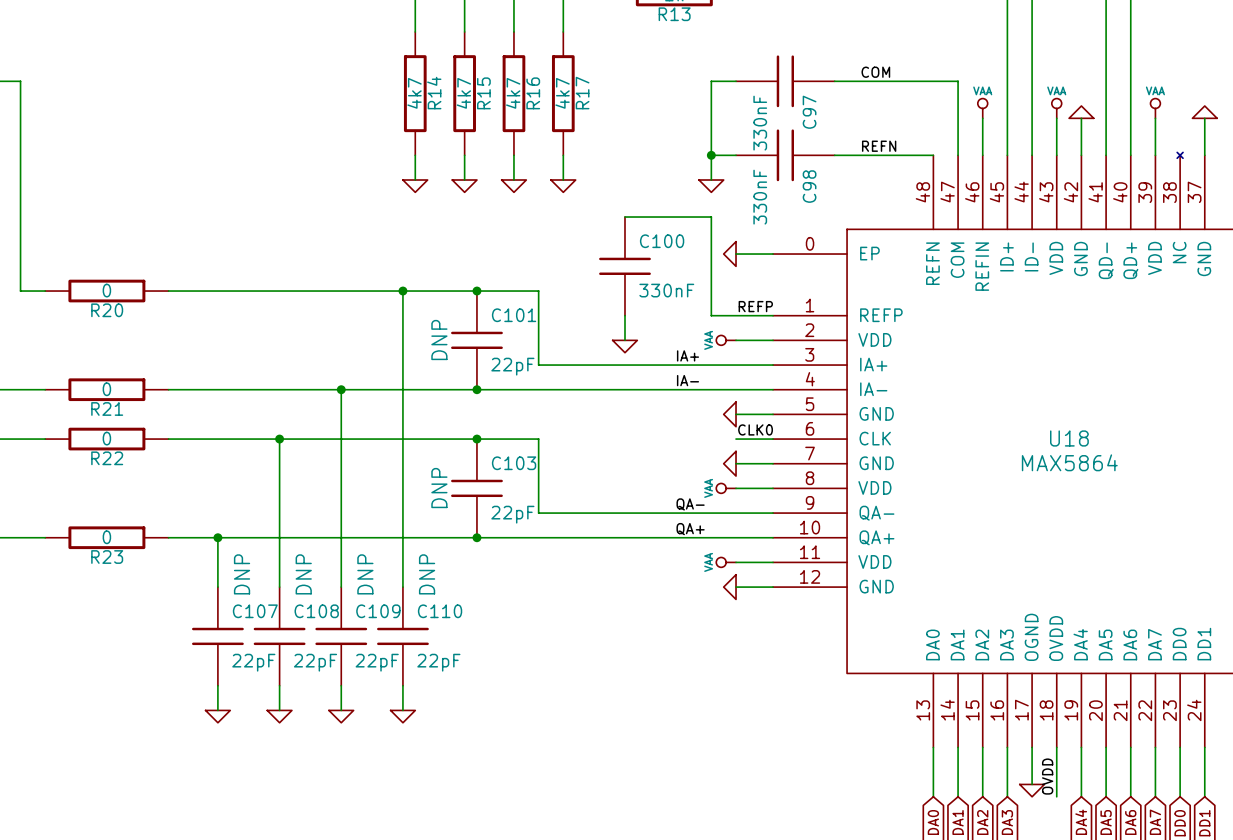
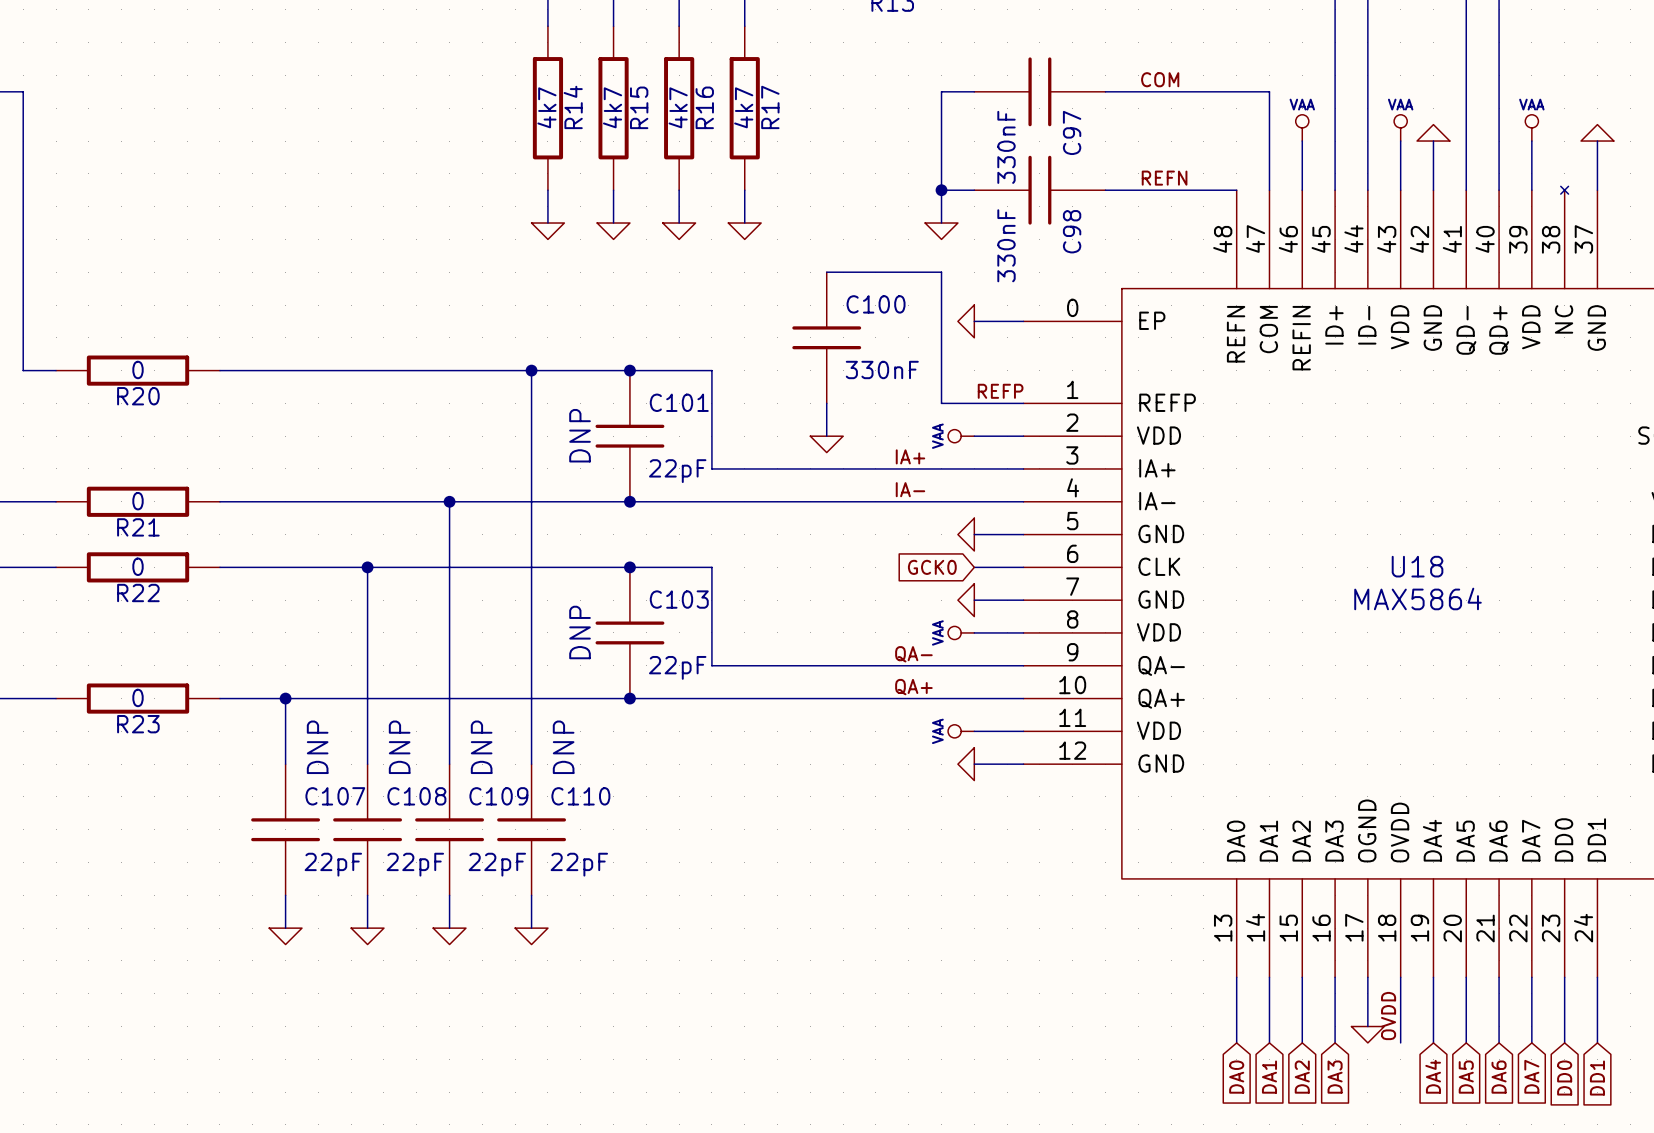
label: CLK0 (755, 429) -> none
global label: none -> GCK0 (932, 567)

